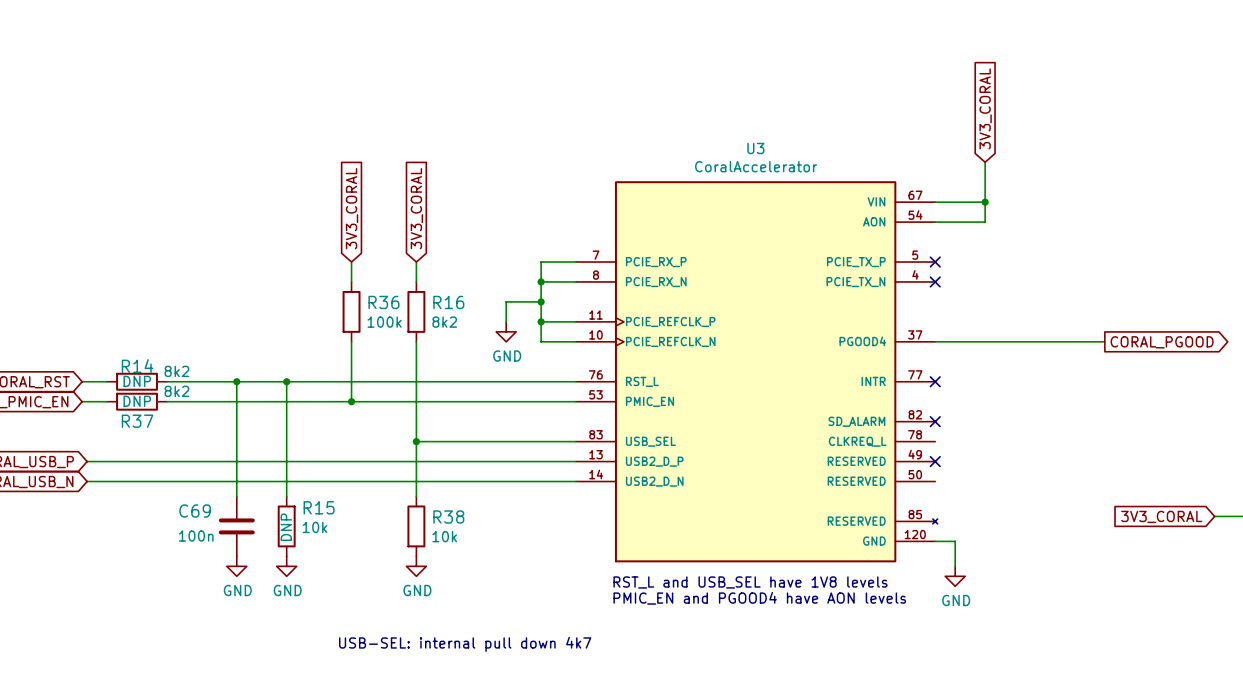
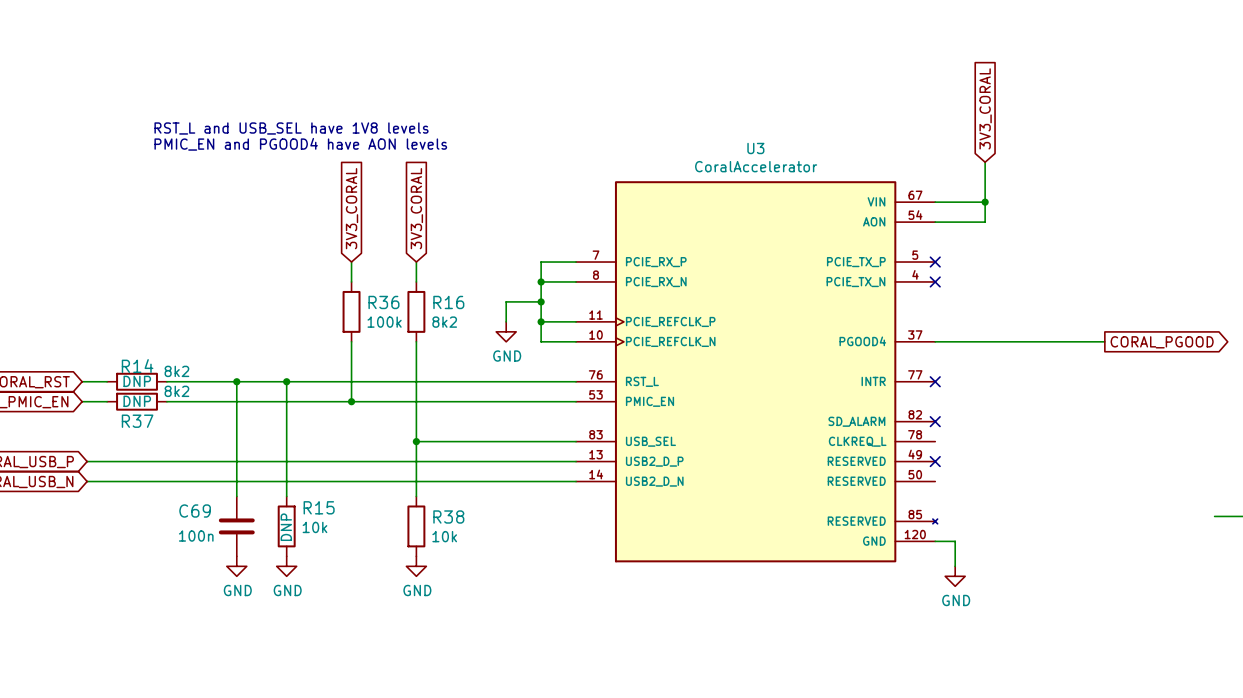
text: none -> RST_L and USB_SEL have 1V8 levels (291, 128)
text: none -> PMIC_EN and PGOOD4 have AON levels (300, 144)
global label: 3V3_CORAL (1161, 516) -> none
text: RST_L and USB_SEL have 1V8 levels (750, 582) -> none
text: PMIC_EN and PGOOD4 have AON levels (759, 598) -> none
text: USB-SEL: internal pull down 4k7 (465, 644) -> none

